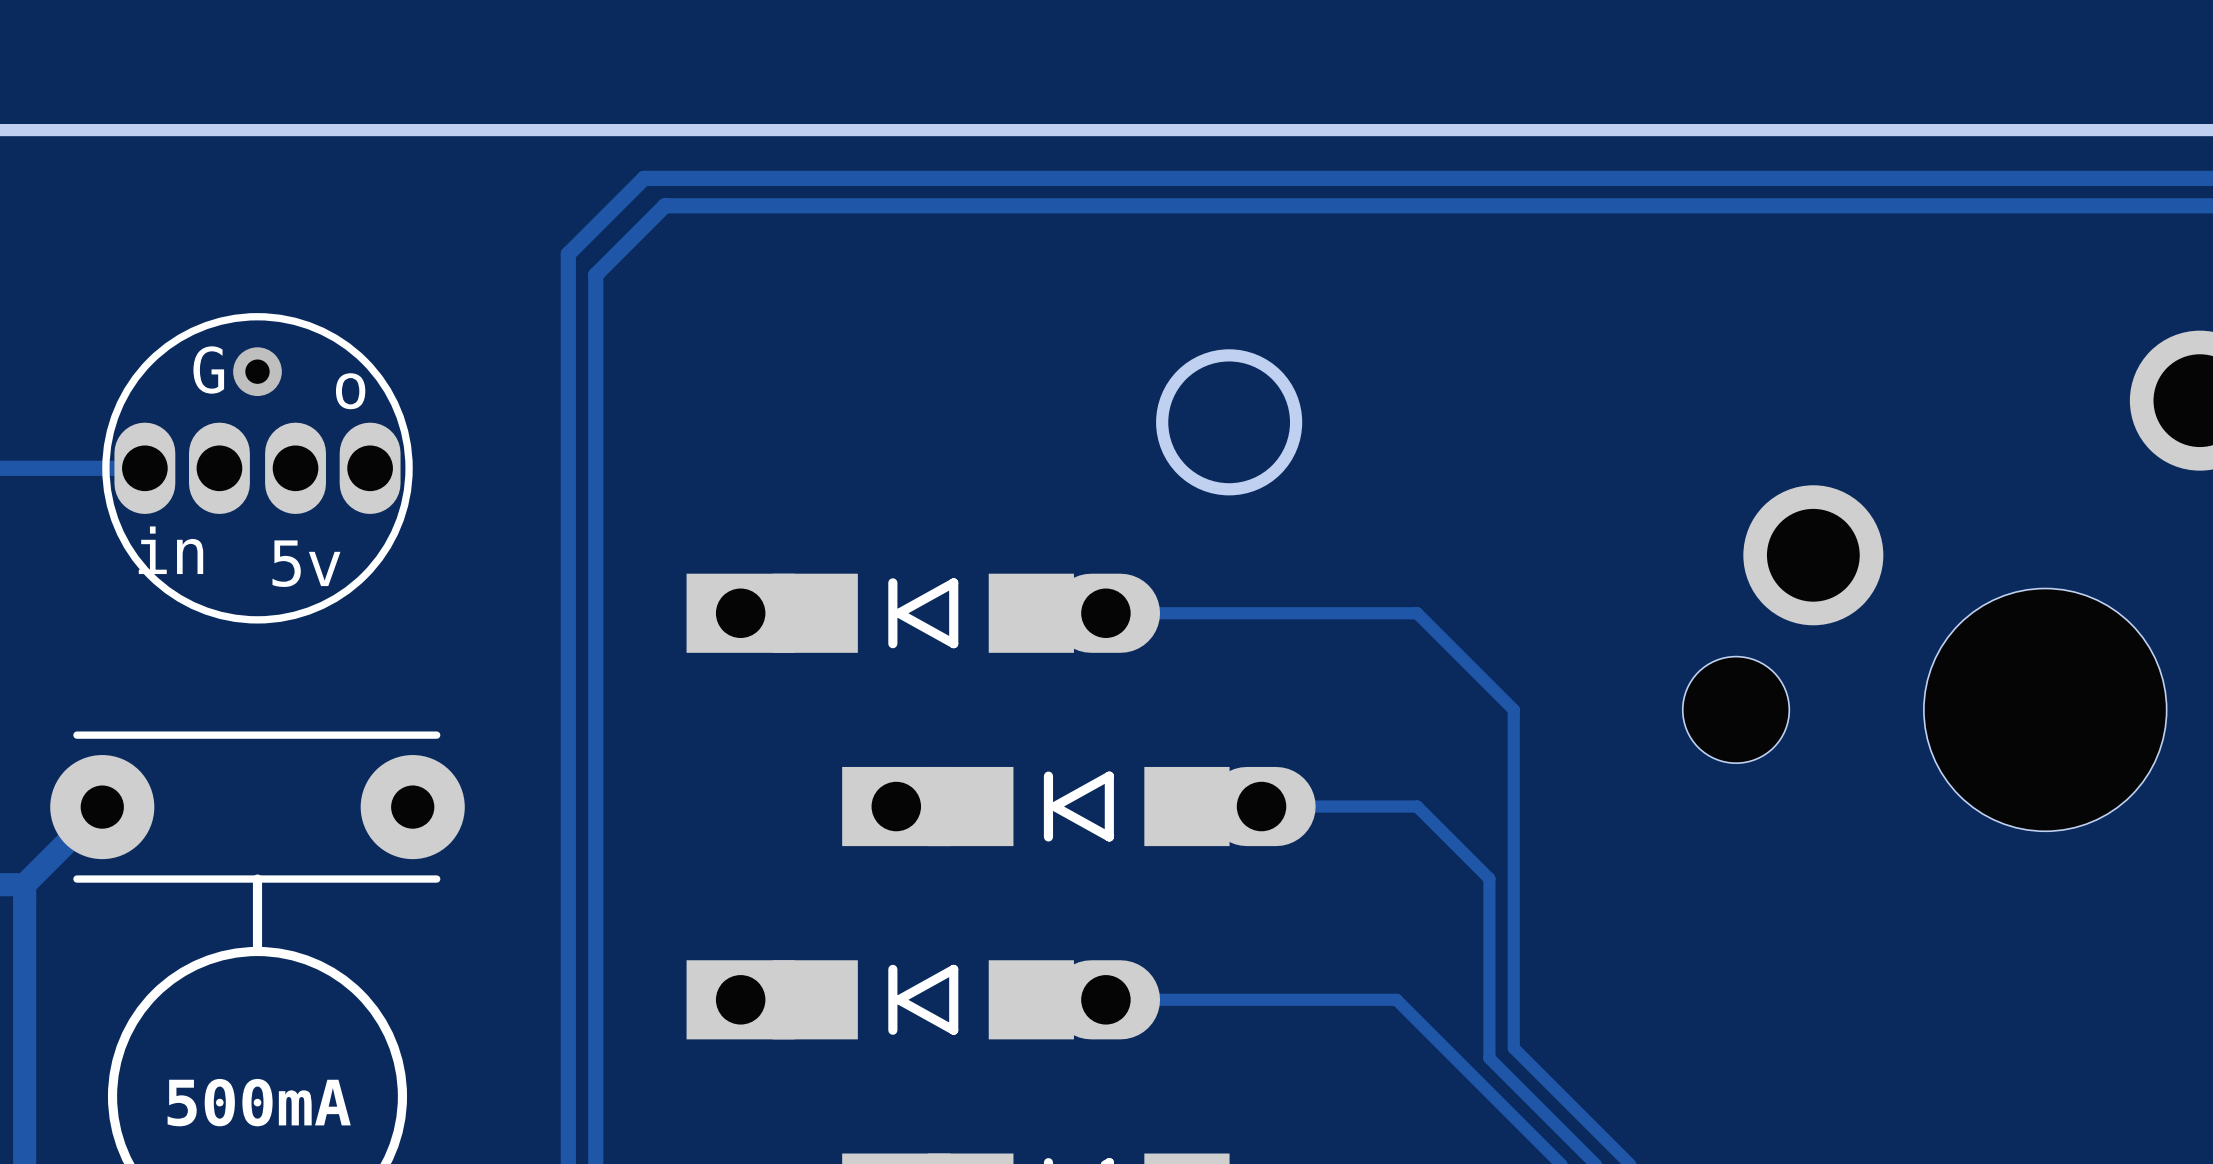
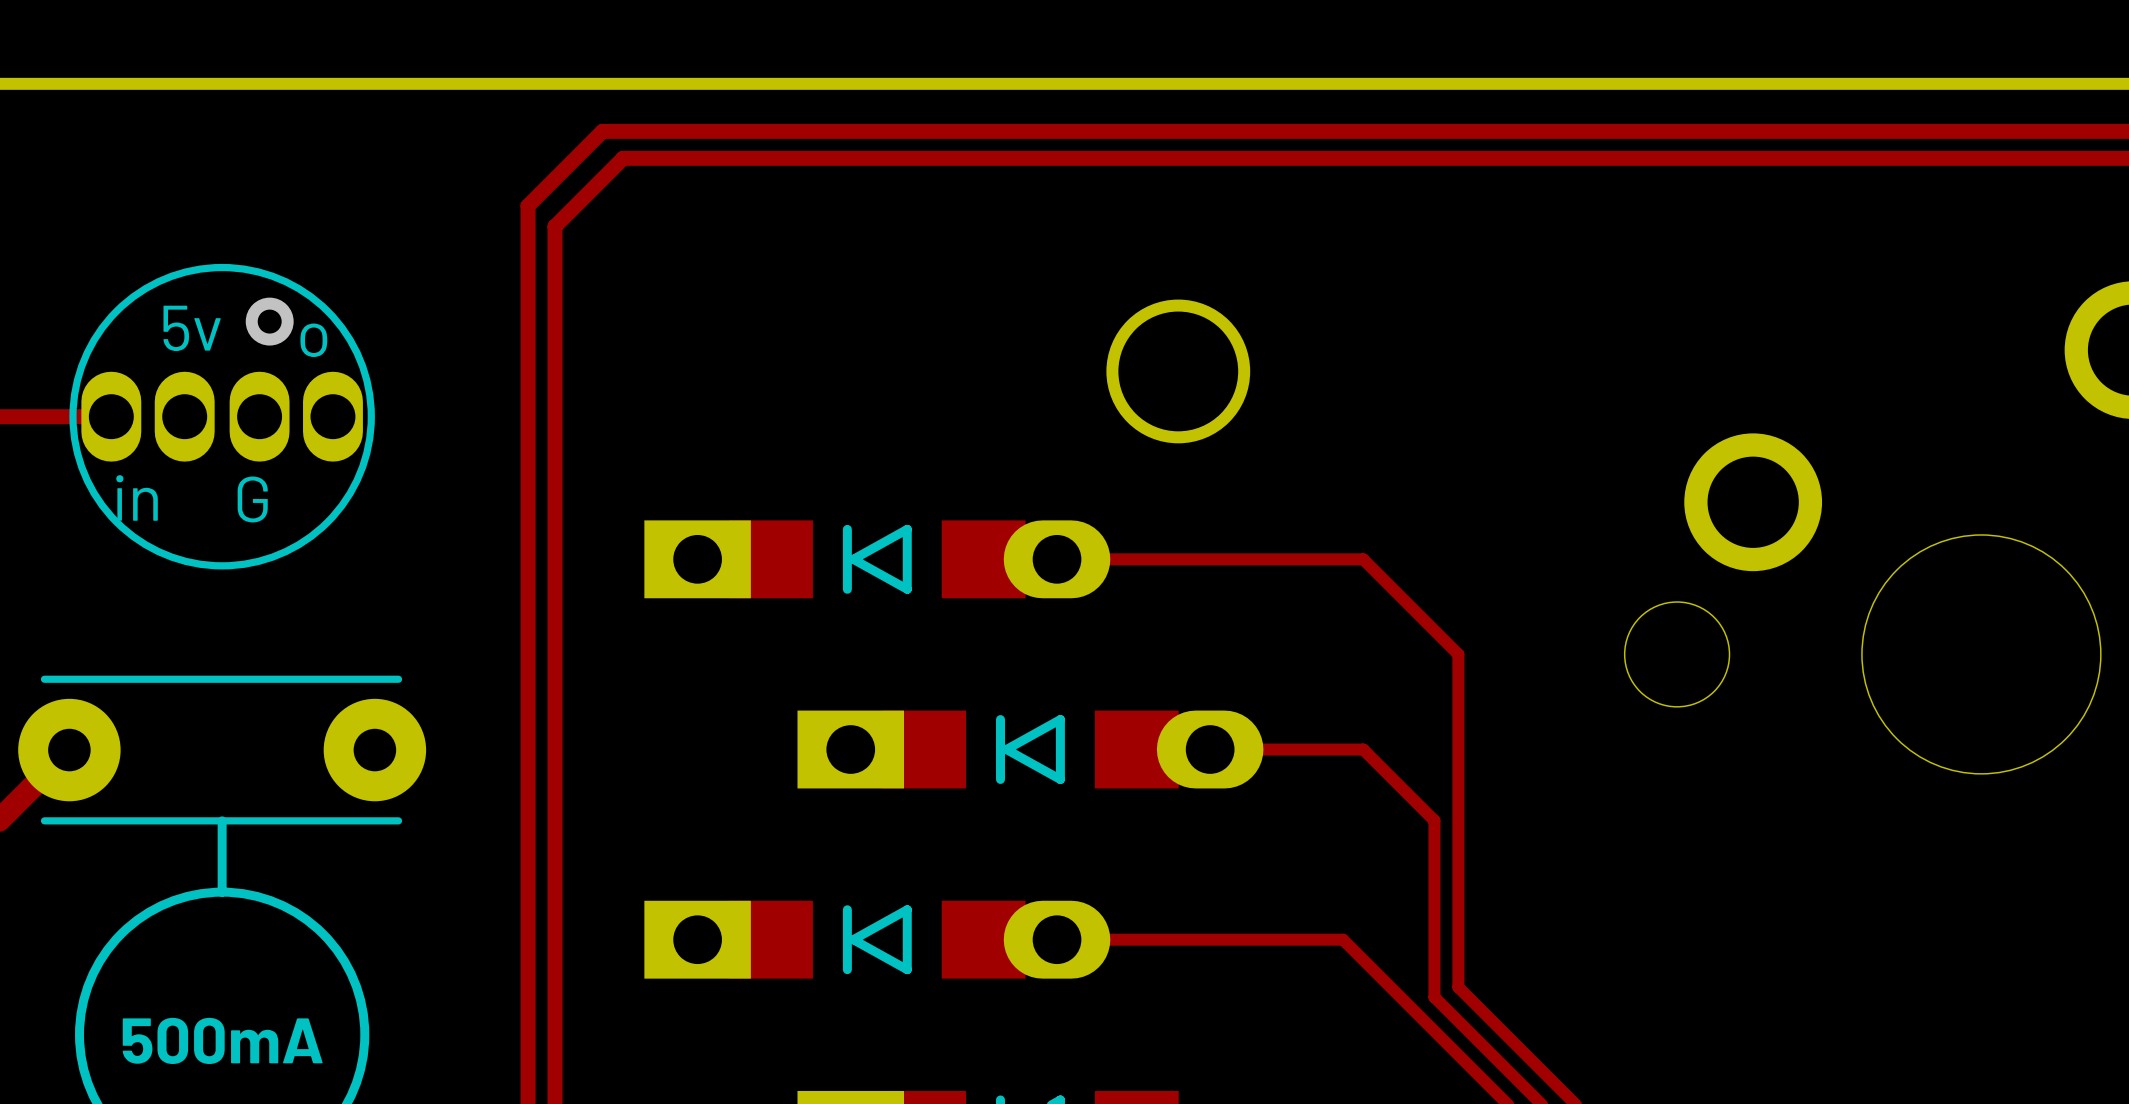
part text position: G (208, 370) -> G (252, 499)
via position: (257, 371) -> (269, 321)
part text position: 5v (306, 563) -> 5v (192, 328)

